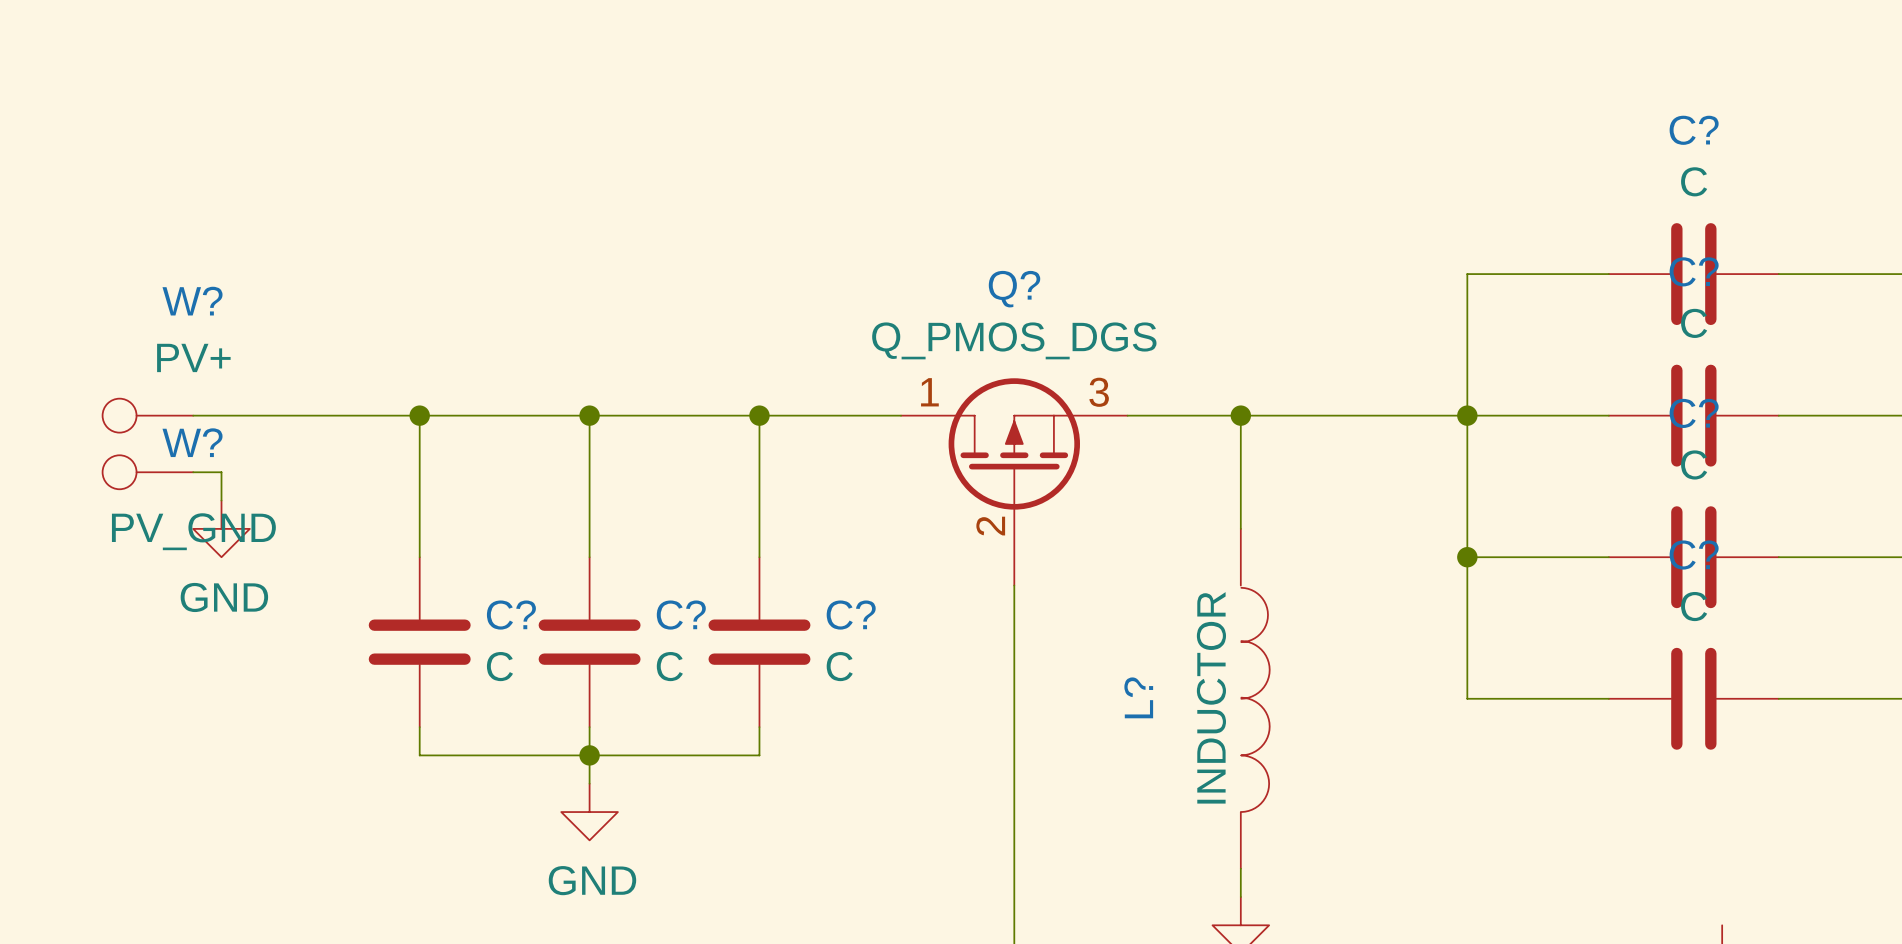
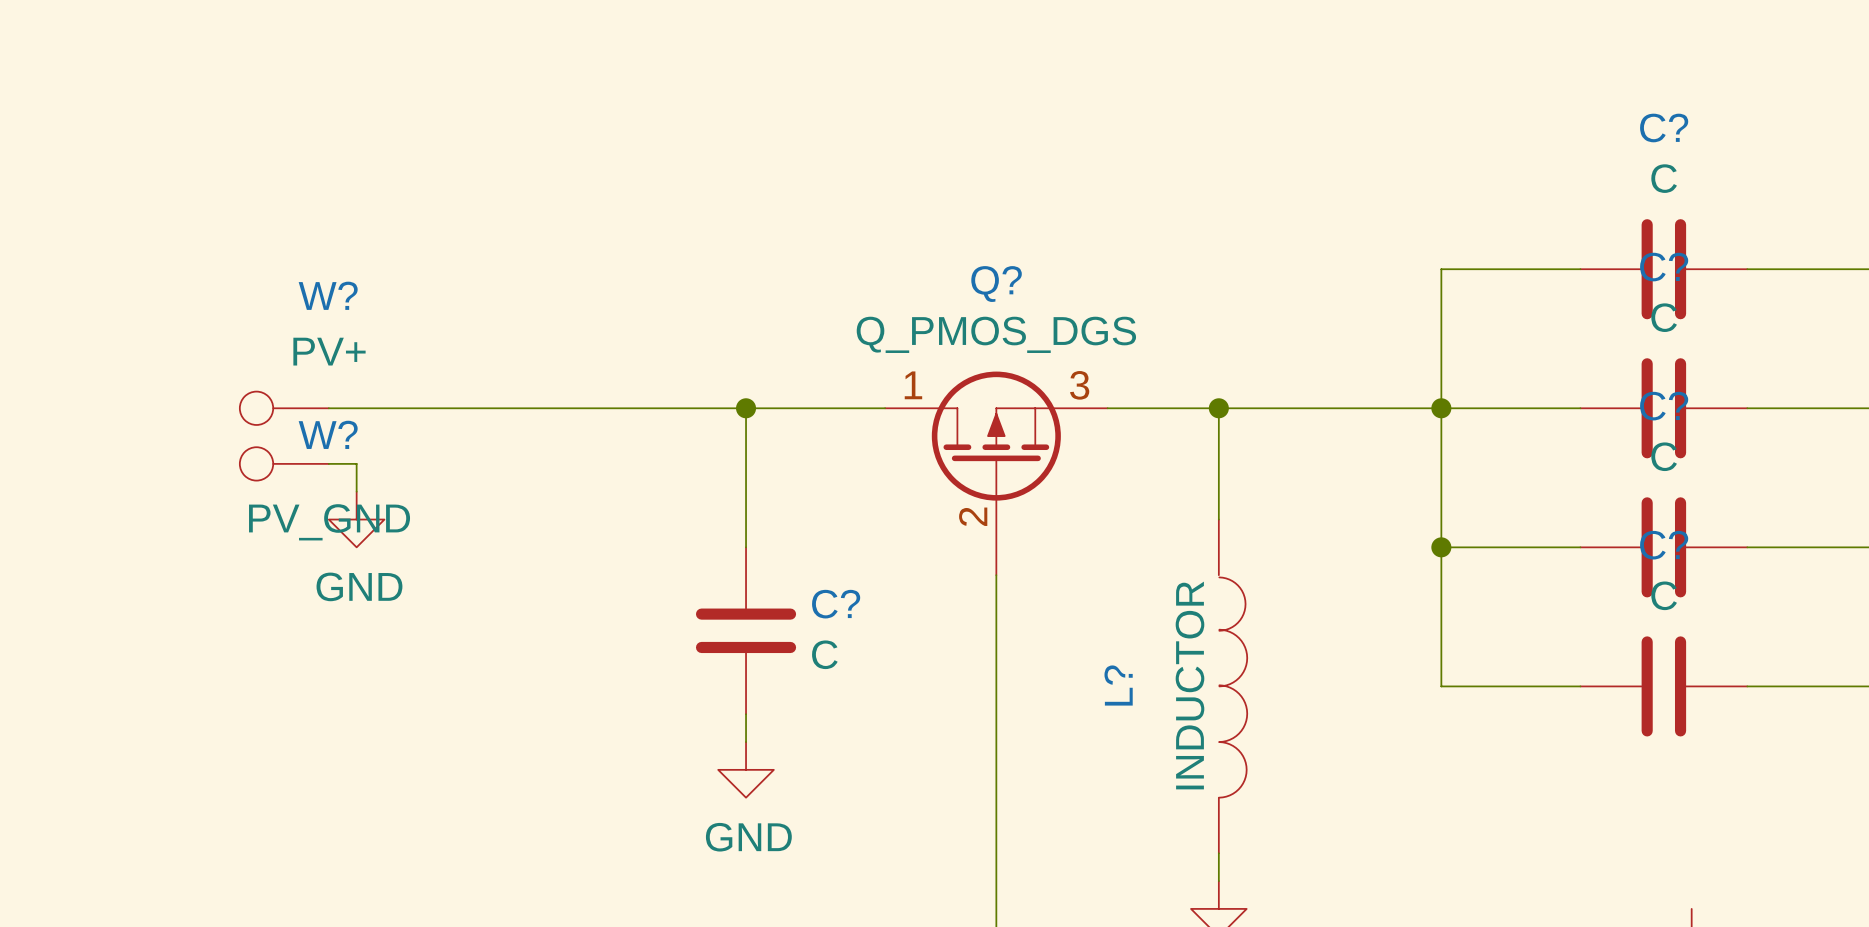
W? position: (147, 415) -> (284, 408)
wire: (193, 415) (334, 415) -> none
wire: (419, 415) (419, 557) -> none
junction: (419, 415) -> none
wire: (589, 415) (589, 557) -> none
junction: (589, 415) -> none
W? position: (147, 472) -> (284, 463)
wire: (193, 472) (221, 472) (221, 500) -> (328, 463) (356, 463) (356, 491)
power symbol position: GND (221, 528) -> GND (356, 519)
C?: C (419, 642) -> none
C?: C (589, 642) -> none
wire: (419, 727) (419, 755) (759, 755) -> none
wire: (589, 727) (589, 783) -> none
junction: (589, 755) -> none
power symbol position: GND (589, 812) -> GND (746, 769)

